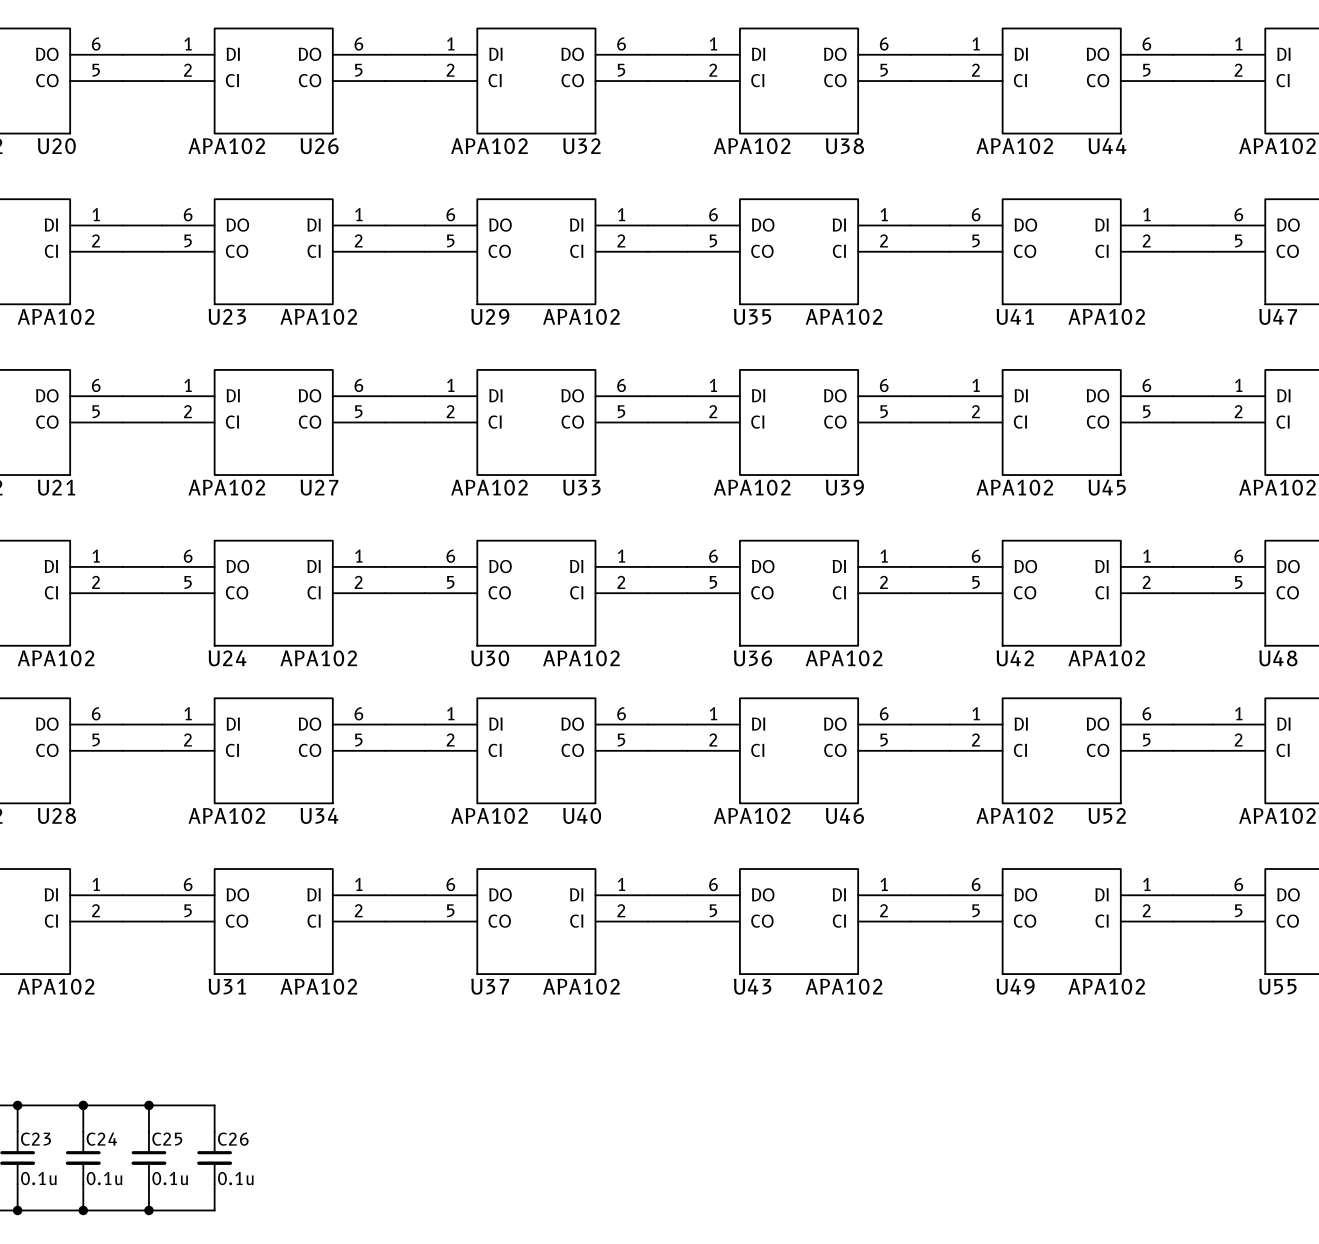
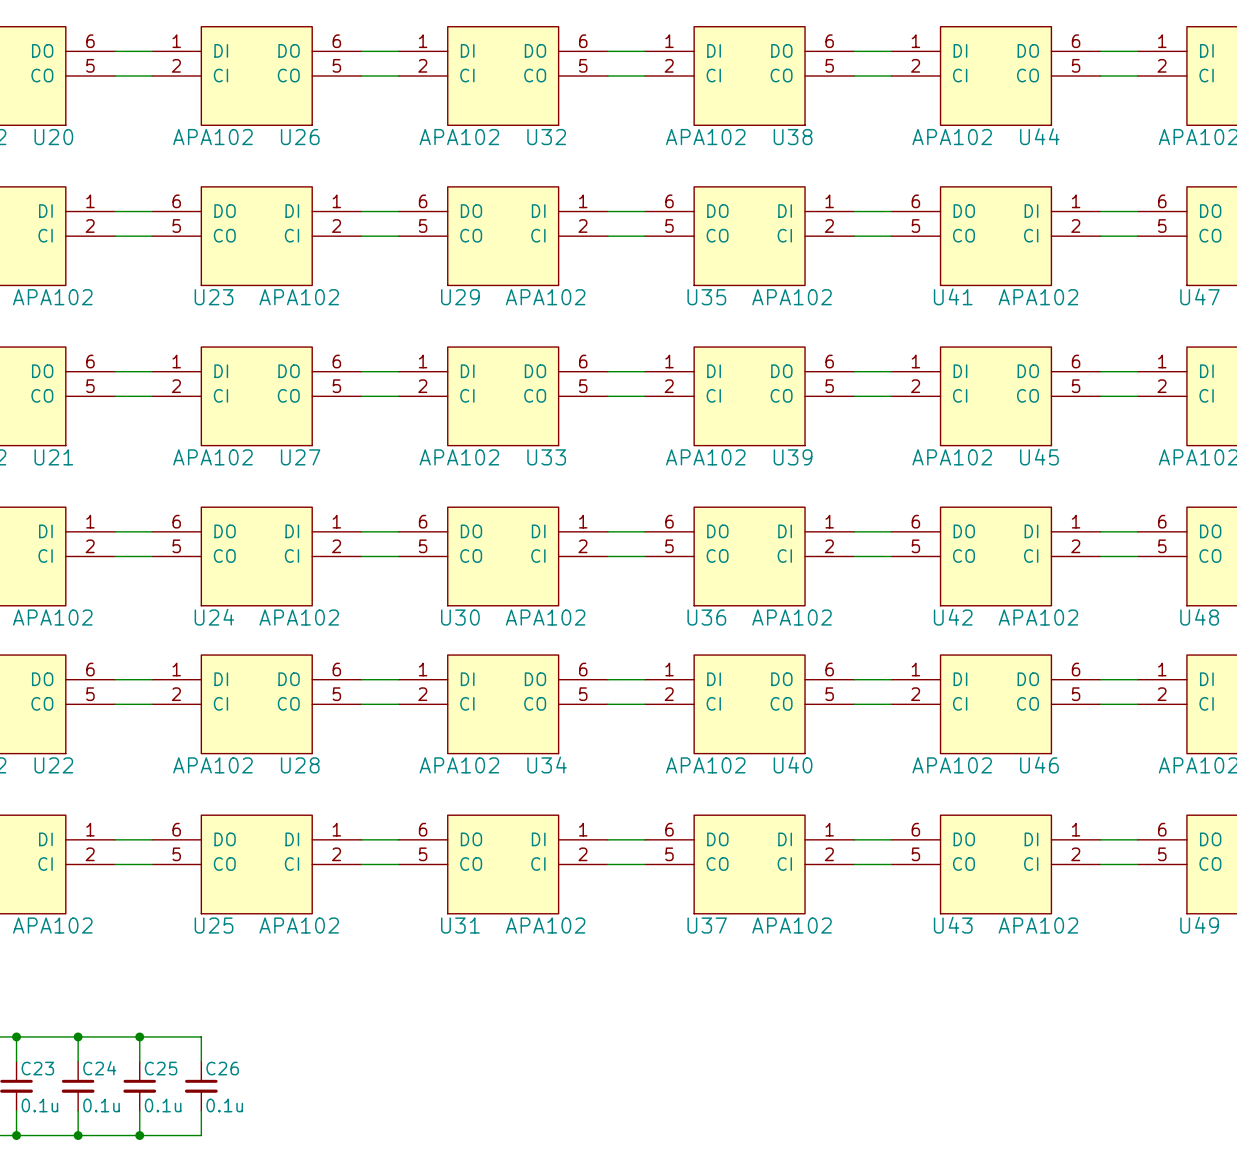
U28 name: U28 (56, 815) -> U22 (53, 765)
U34 name: U34 (319, 815) -> U28 (300, 765)
U40 name: U40 (582, 815) -> U34 (547, 765)
U46 name: U46 (844, 815) -> U40 (793, 765)
U52 name: U52 (1107, 815) -> U46 (1039, 765)
U31 name: U31 (227, 986) -> U25 (214, 925)
U37 name: U37 (490, 986) -> U31 (460, 925)
U43 name: U43 (752, 986) -> U37 (707, 925)
U49 name: U49 (1015, 986) -> U43 (953, 925)
U55 name: U55 (1277, 986) -> U49 (1199, 925)

